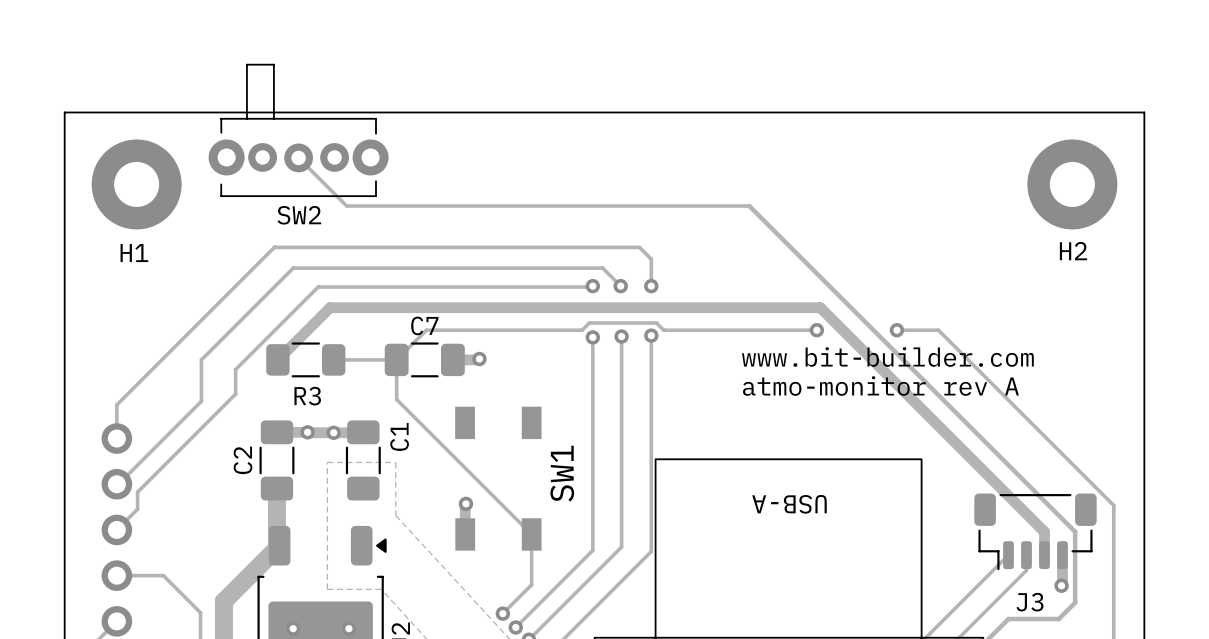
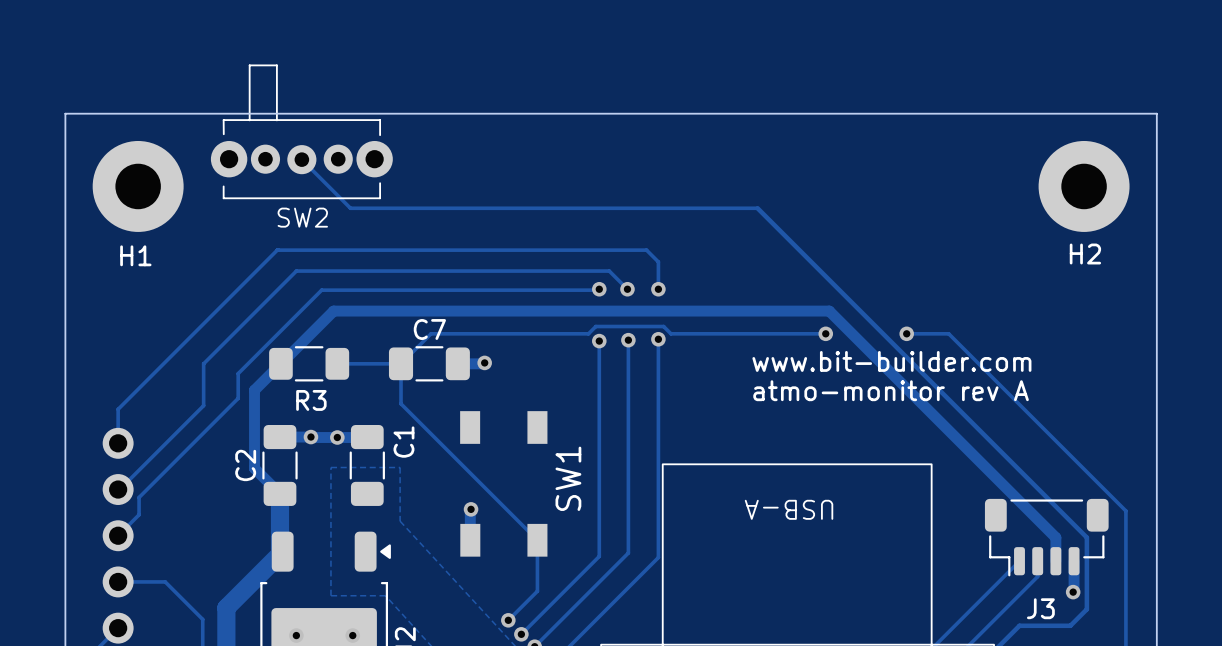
track: none -> (280, 363) (254, 390) (254, 468) (279, 493)

